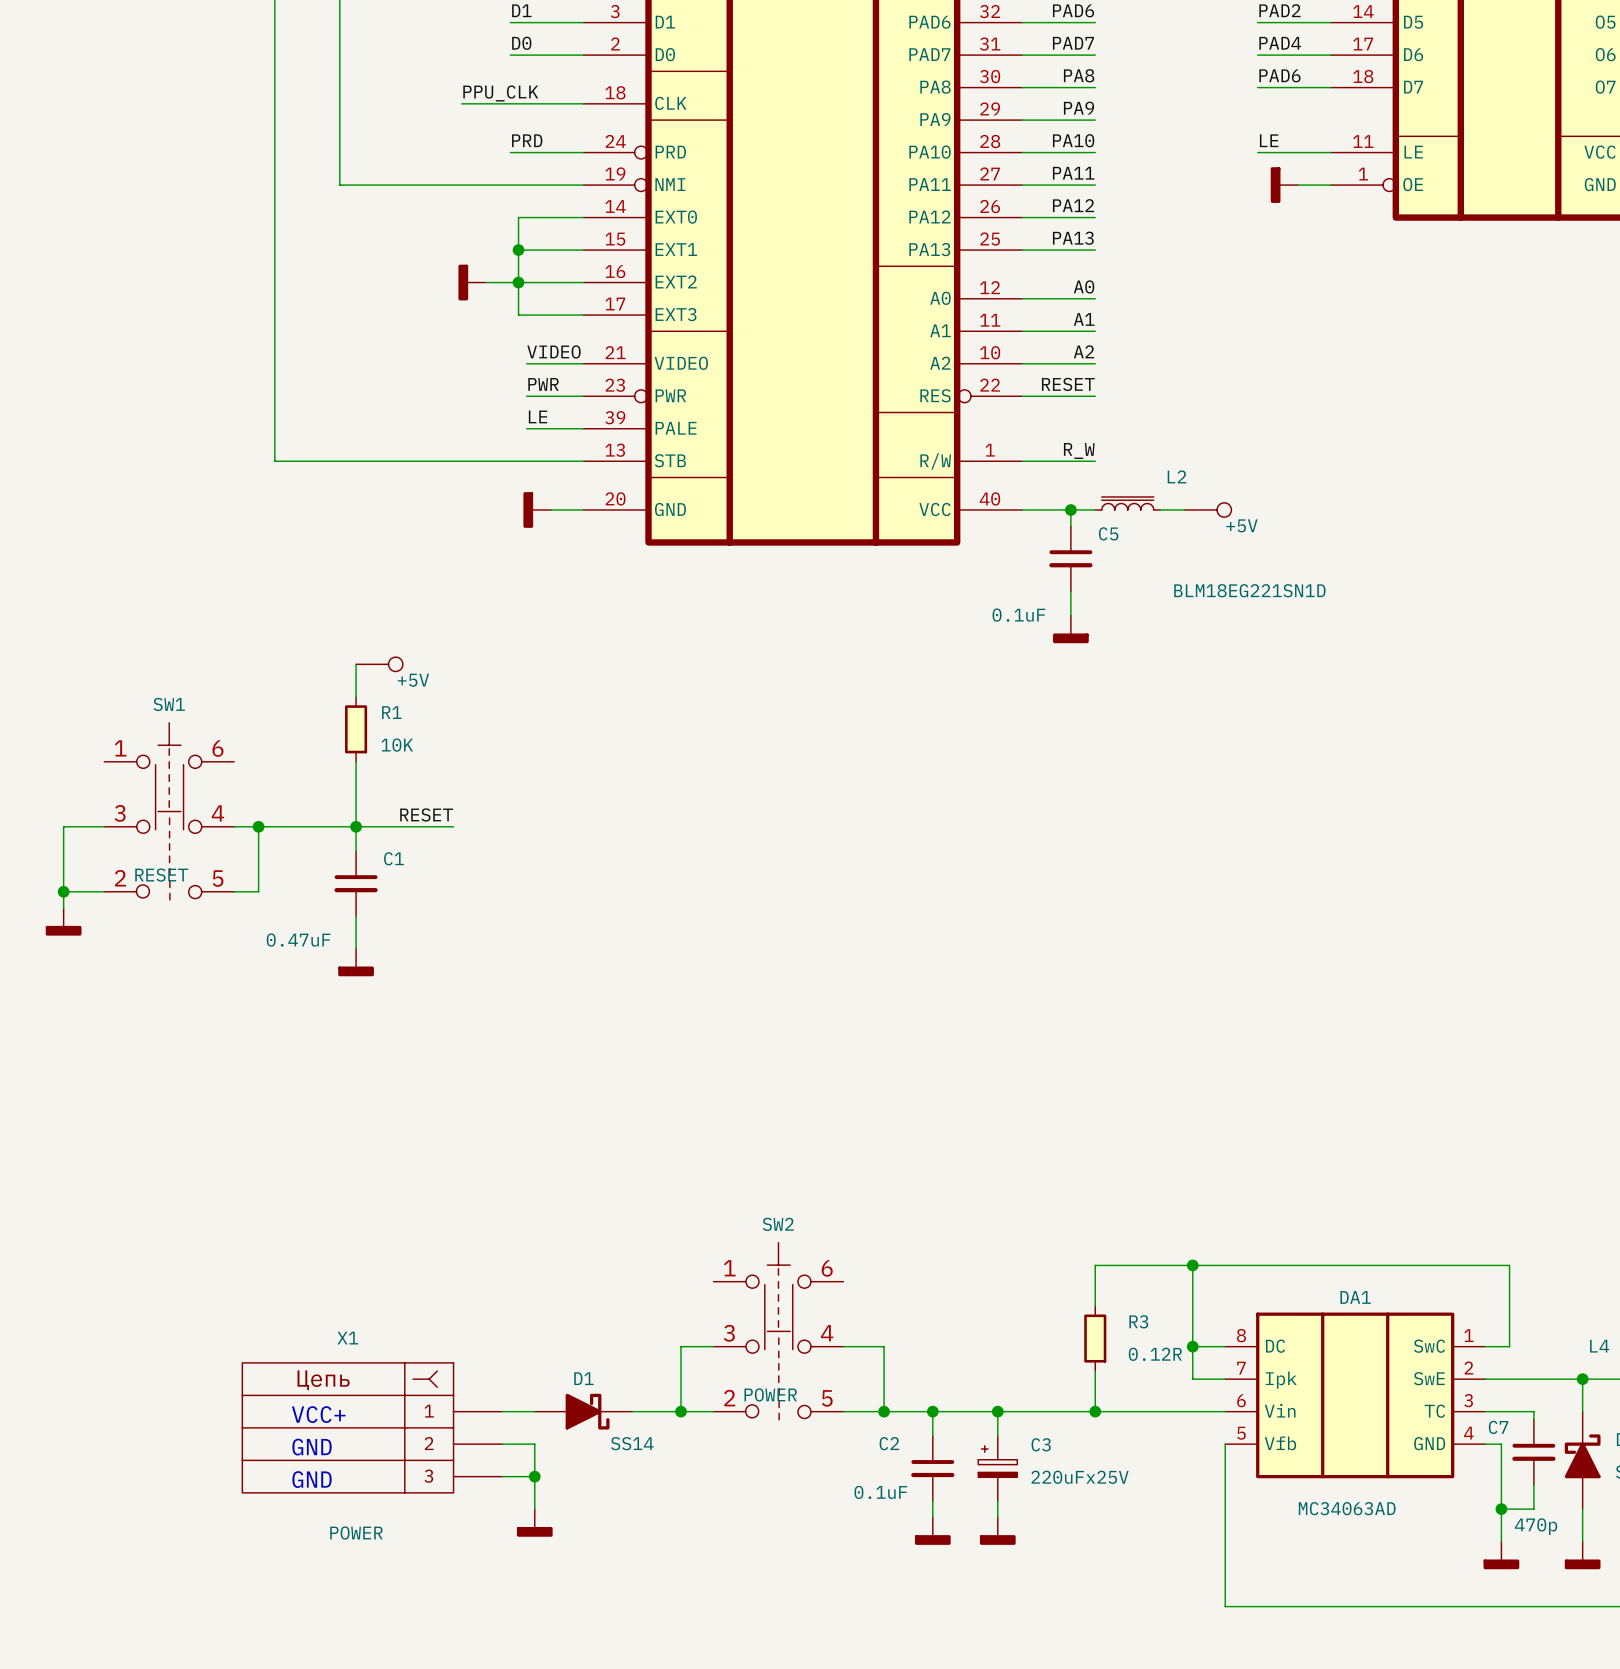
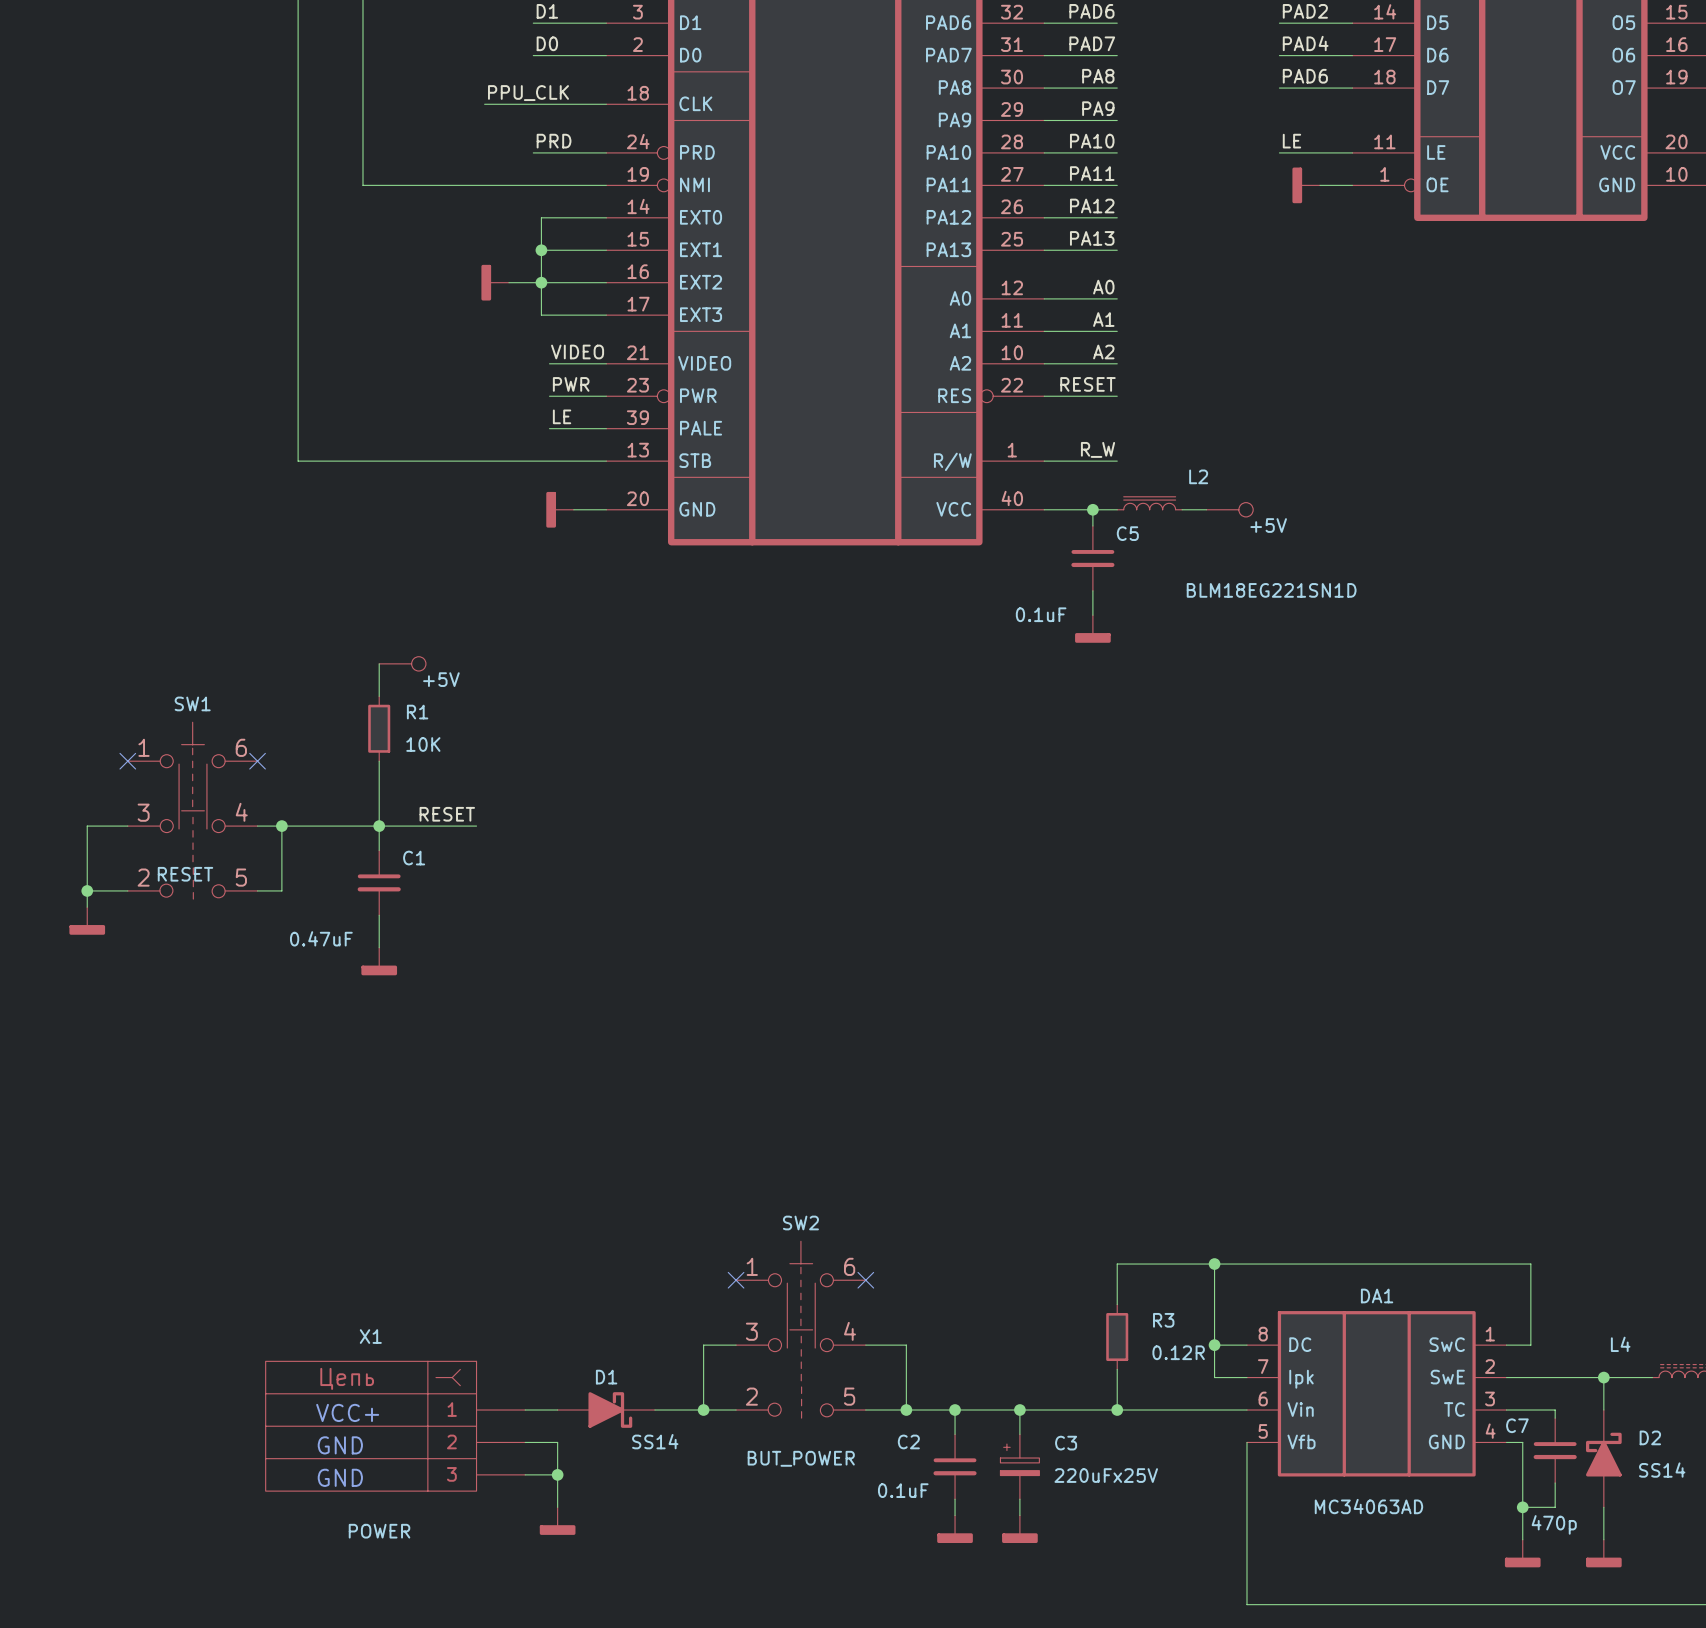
no-connect mark: none -> (127, 761)
no-connect mark: none -> (257, 761)
no-connect mark: none -> (736, 1280)
no-connect mark: none -> (865, 1280)
SW2 value: POWER (770, 1394) -> BUT_POWER (801, 1458)

